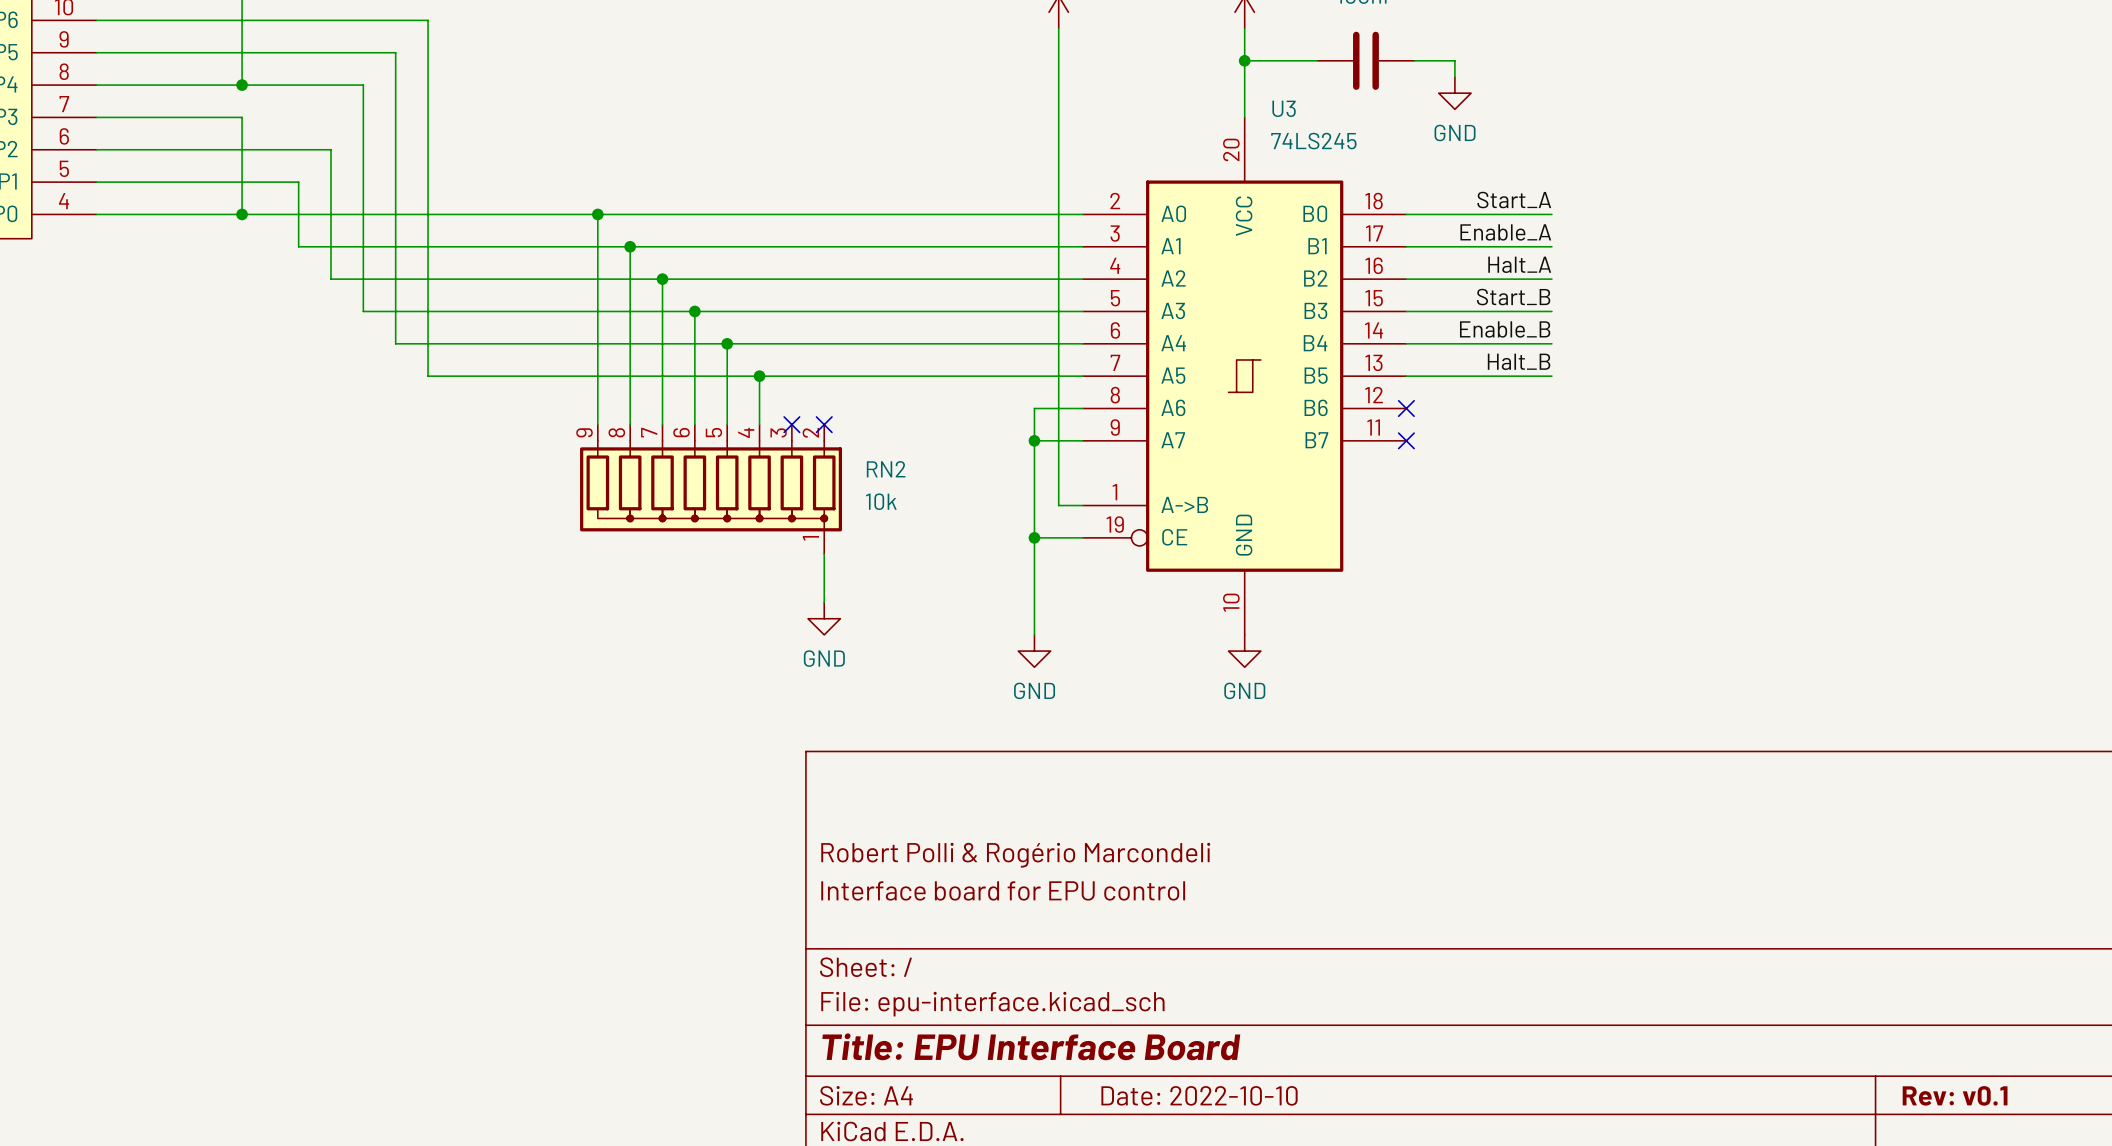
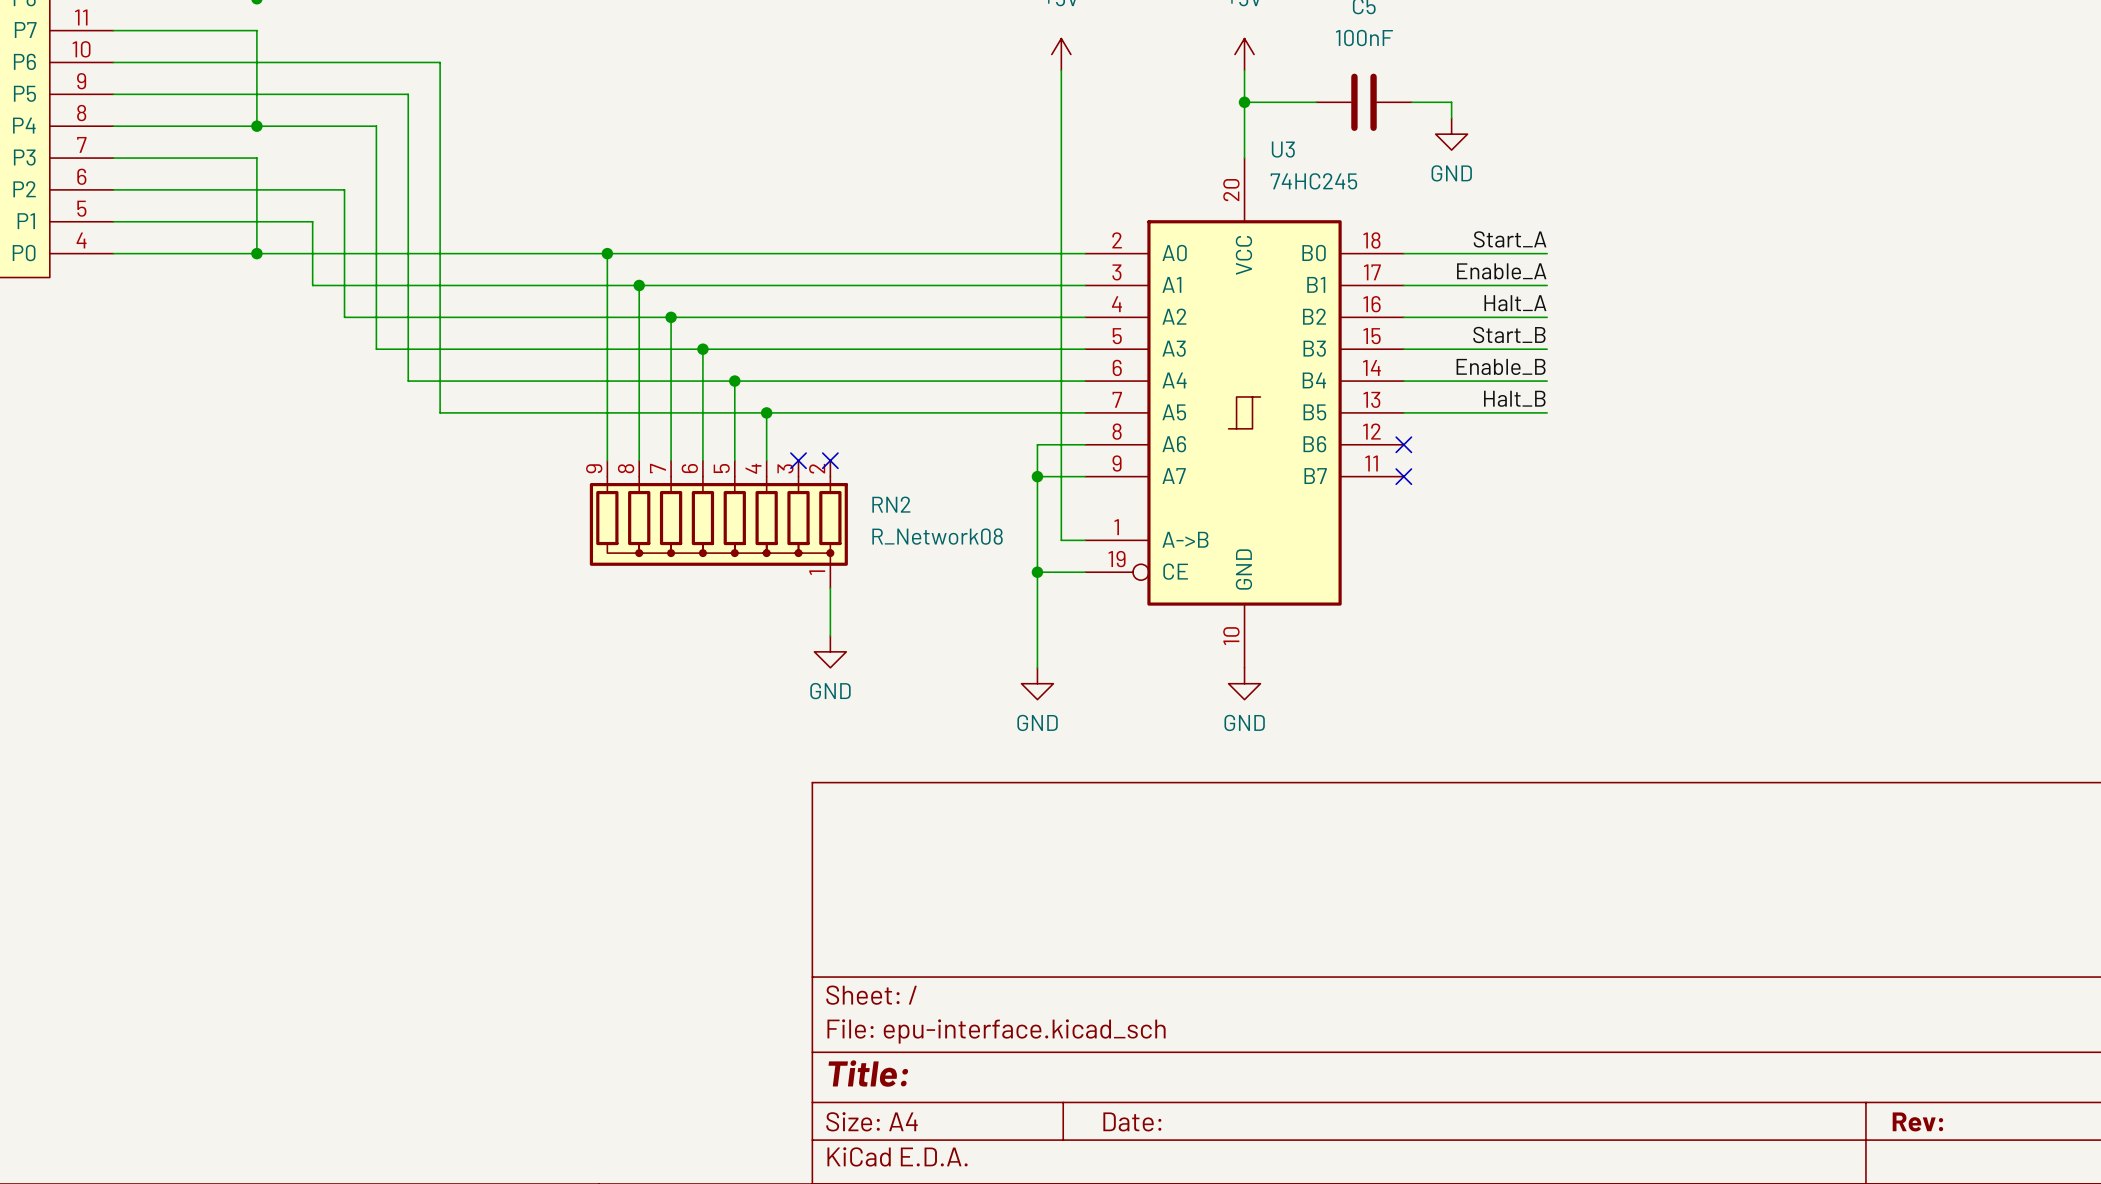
U3 value: 74LS245 (1313, 141) -> 74HC245 (1313, 181)
RN2 value: 10k (881, 501) -> R_Network08 (937, 536)
title block: Robert Polli & Rogério Marcondeli (1015, 855) -> none
title block: Interface board for EPU control (1003, 890) -> none
title block: Title: EPU Interface Board (1031, 1046) -> Title: (868, 1073)
title block: Date: 2022-10-10 (1199, 1095) -> Date: (1132, 1121)
title block: Rev: v0.1 (1955, 1095) -> Rev: (1917, 1121)

